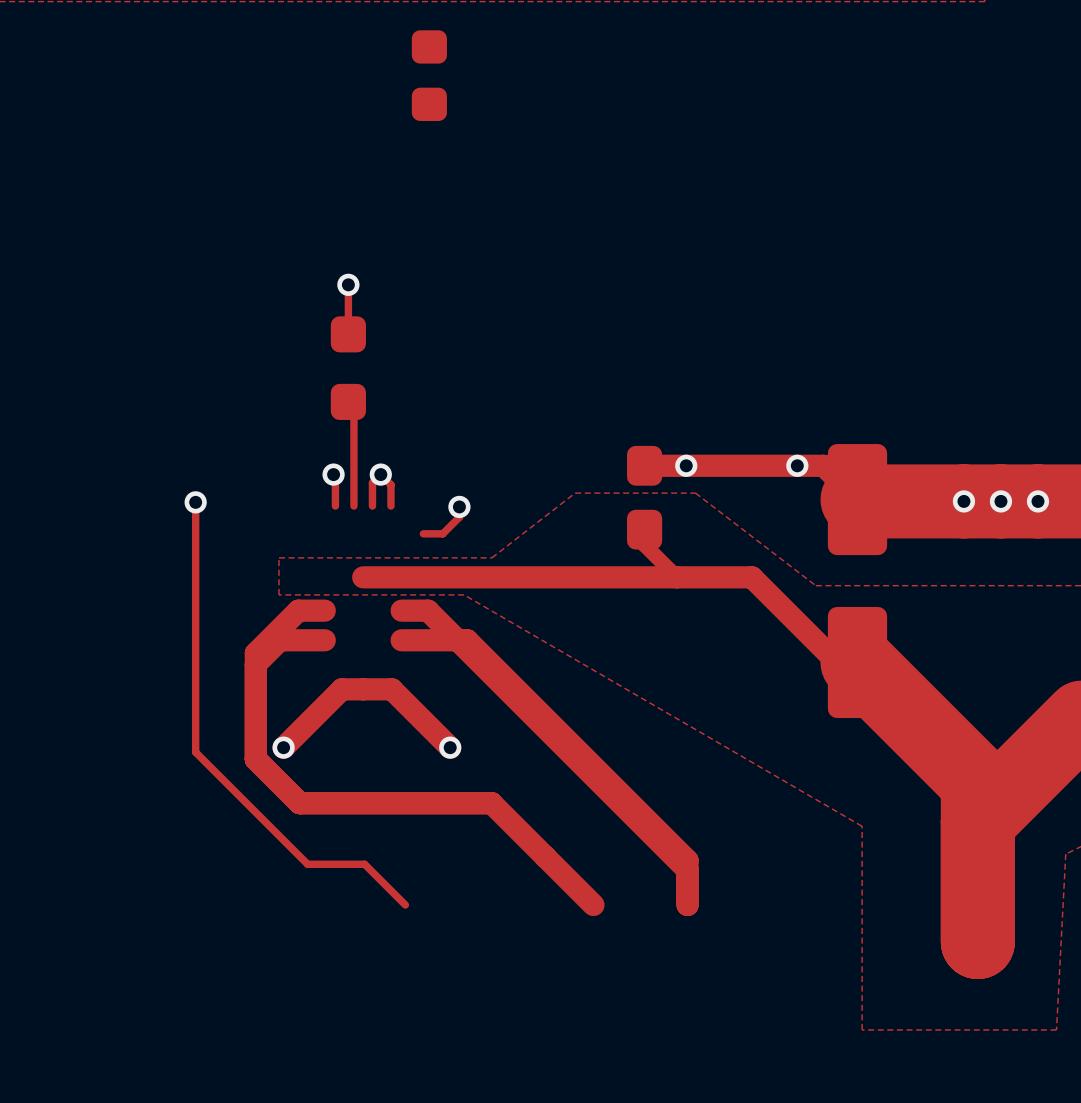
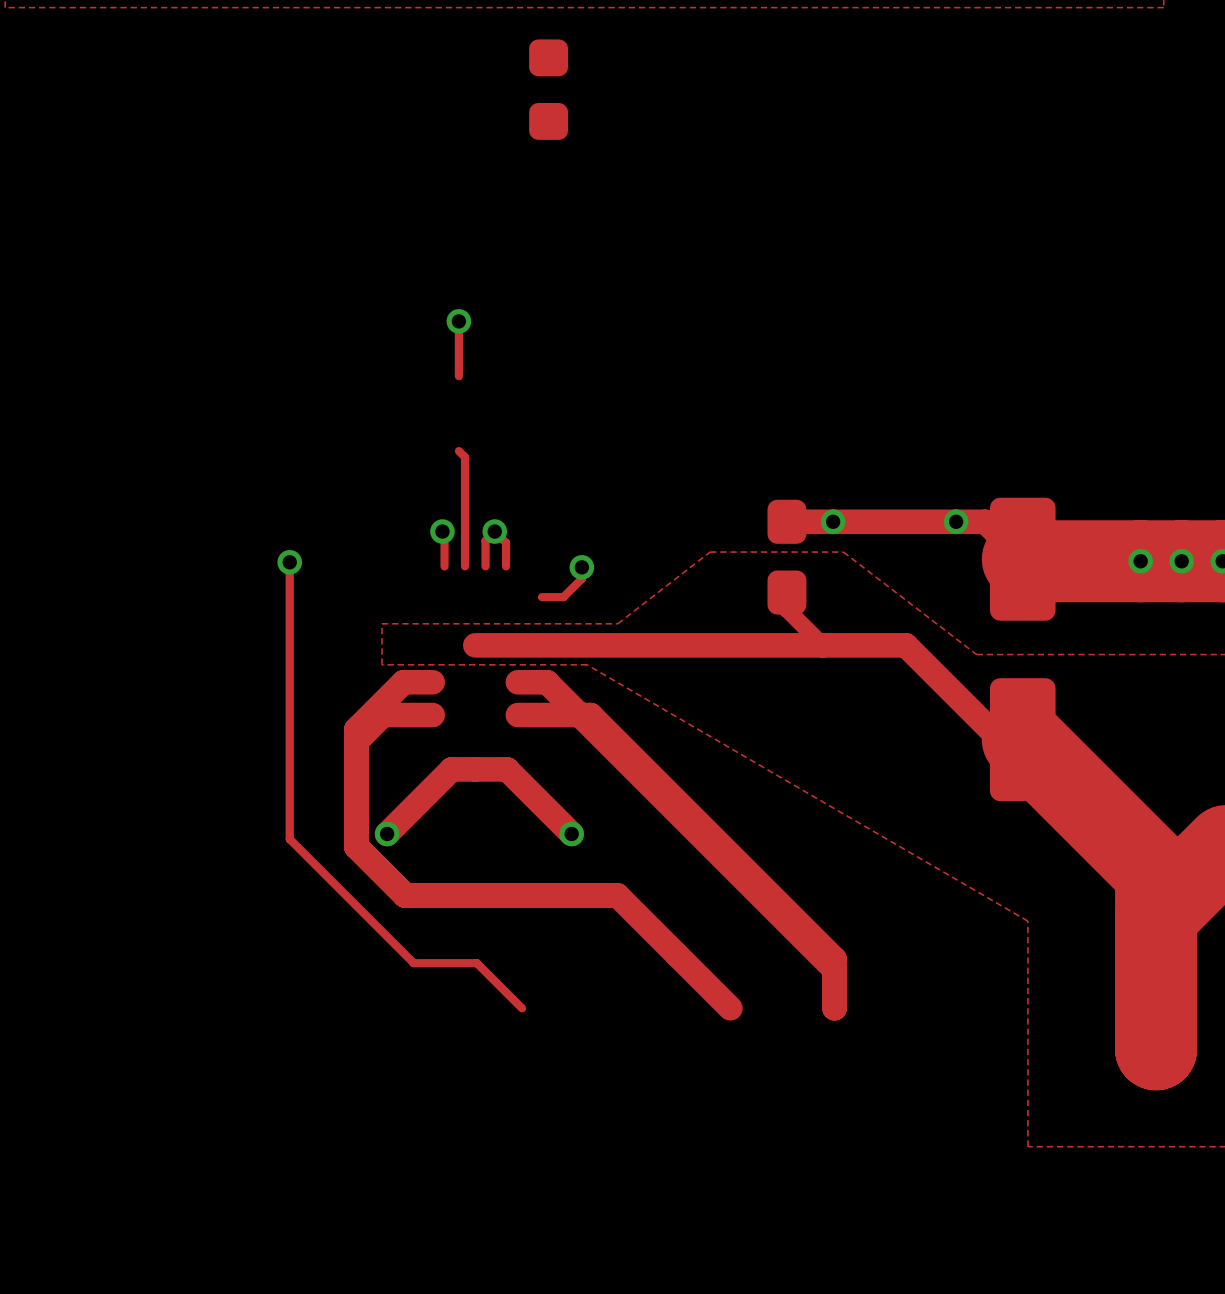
part: (348, 368) -> none

